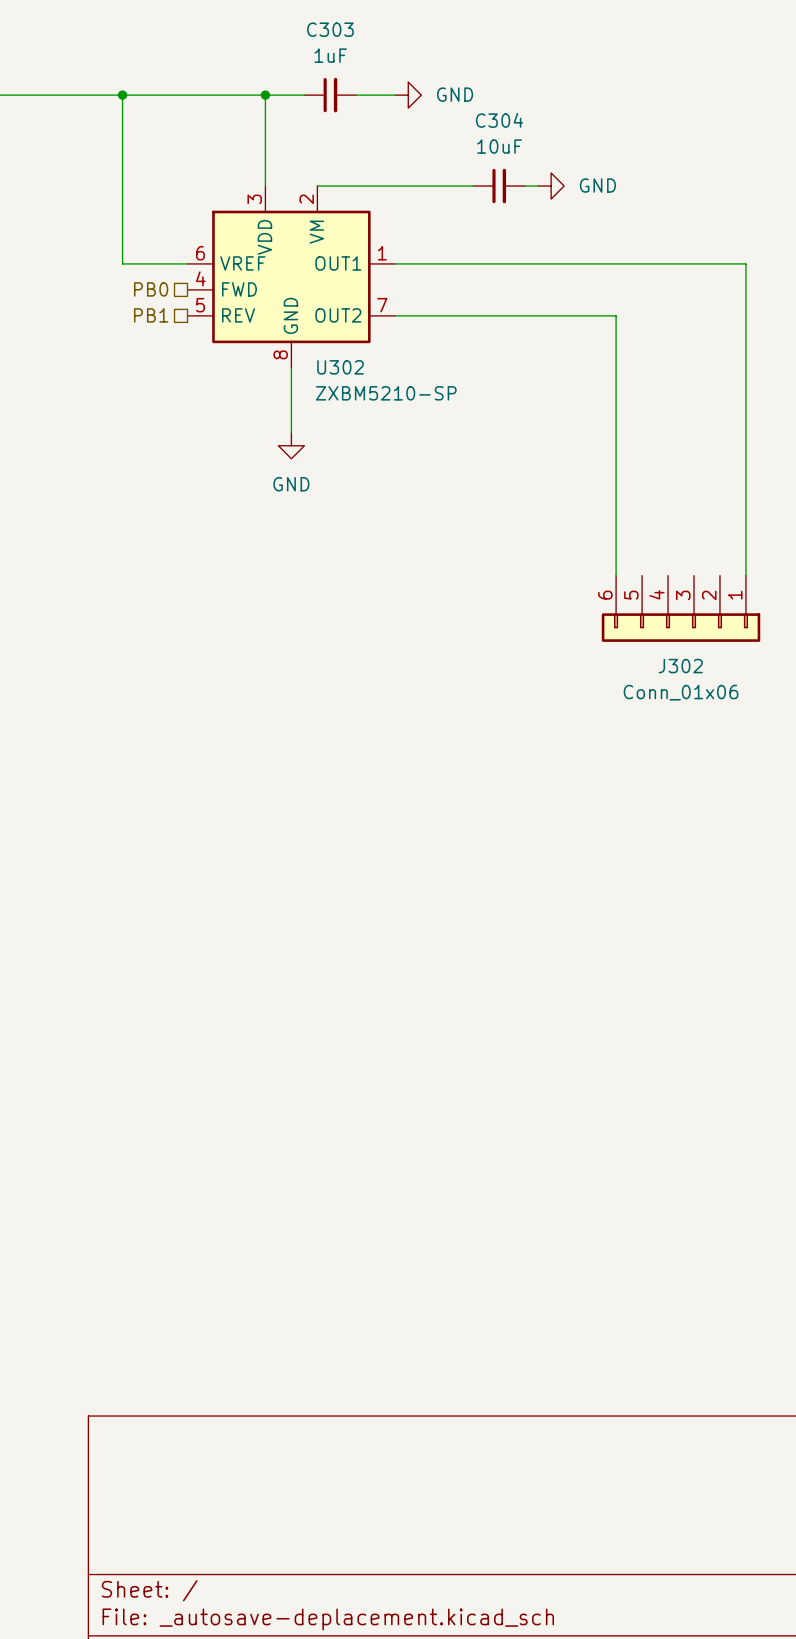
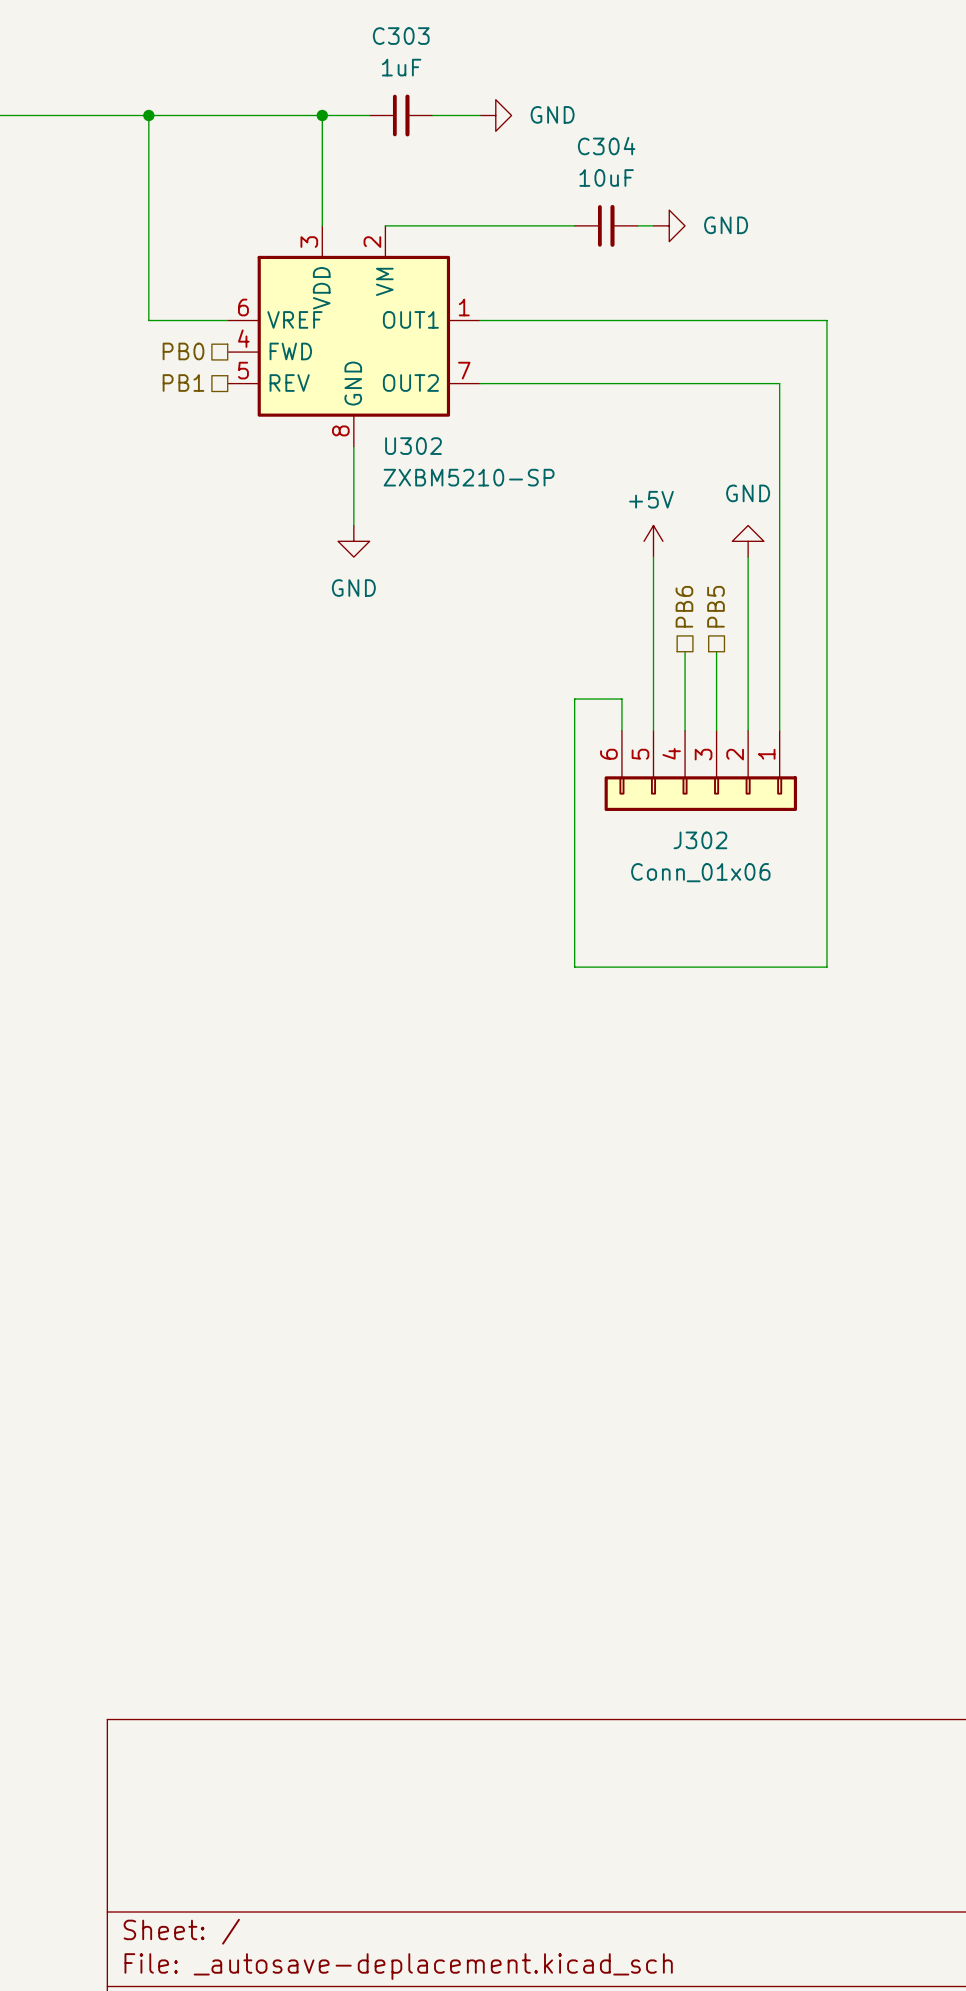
wire: (681, 263) (745, 263) (745, 575) -> (826, 320) (826, 967) (574, 967) (574, 699) (621, 699) (621, 730)
wire: (616, 315) (616, 458) -> (748, 383) (779, 383) (779, 730)
power symbol: none -> +5V (653, 541)
power symbol: none -> GND (748, 541)
wire: none -> (653, 557) (653, 730)
hierarchical label: none -> PB6 (684, 606)
hierarchical label: none -> PB5 (715, 606)
wire: none -> (685, 651) (685, 730)
wire: none -> (716, 651) (716, 730)
J302 position: (681, 608) -> (700, 770)

